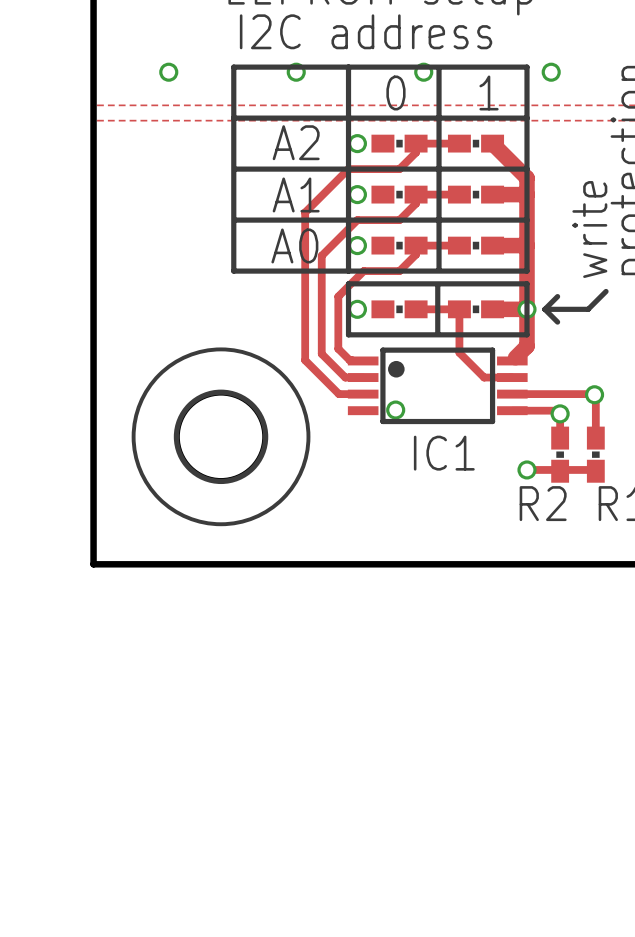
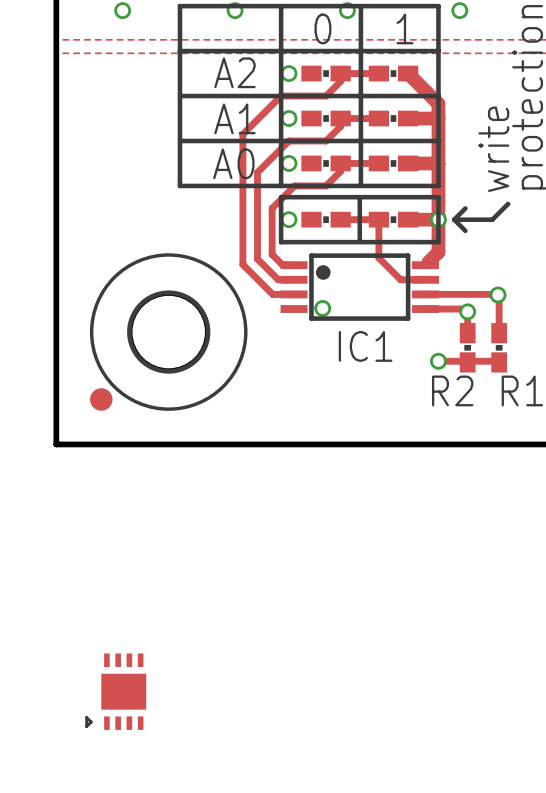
part: none -> (101, 399)
part: none -> (115, 691)

